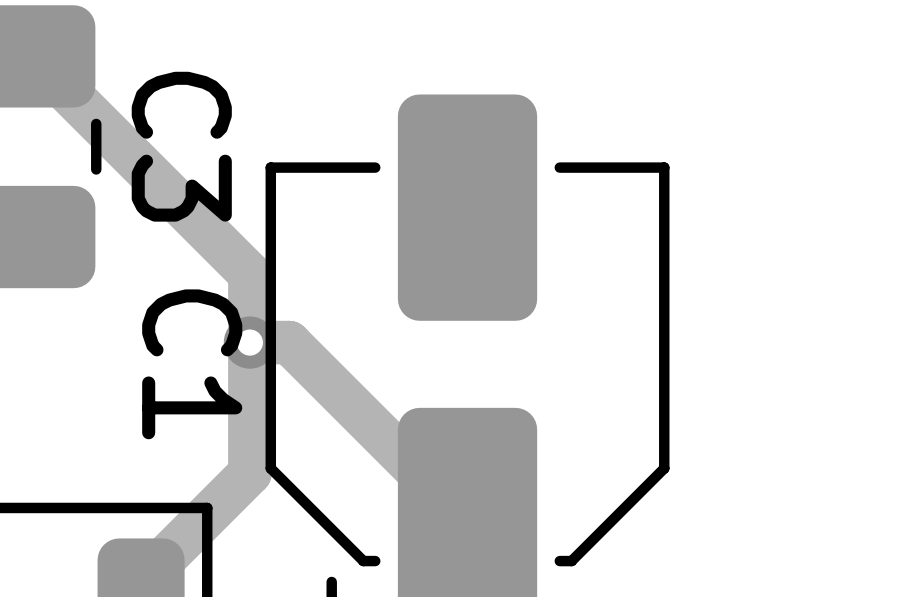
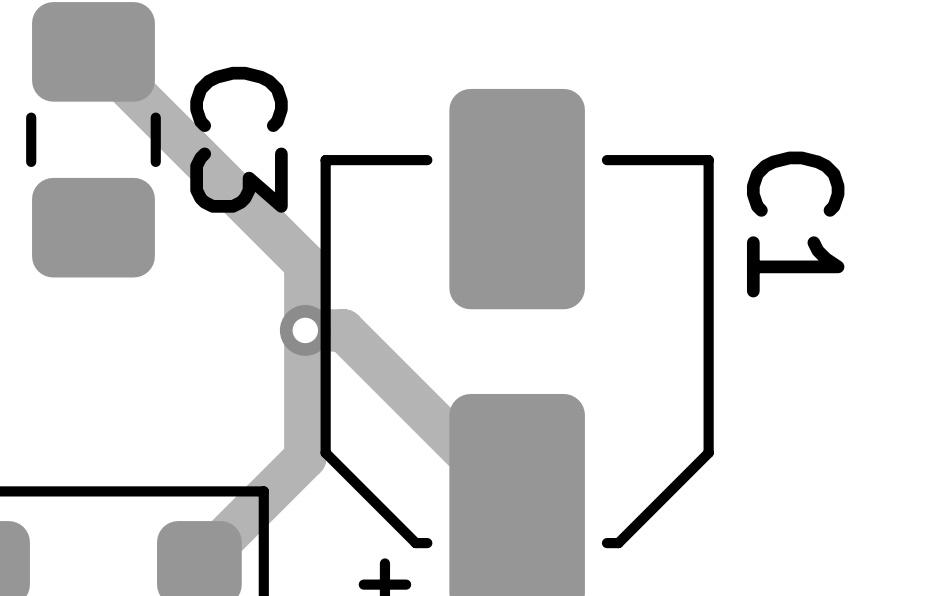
C1 name position: C1 (192, 364) -> C1 (795, 224)

